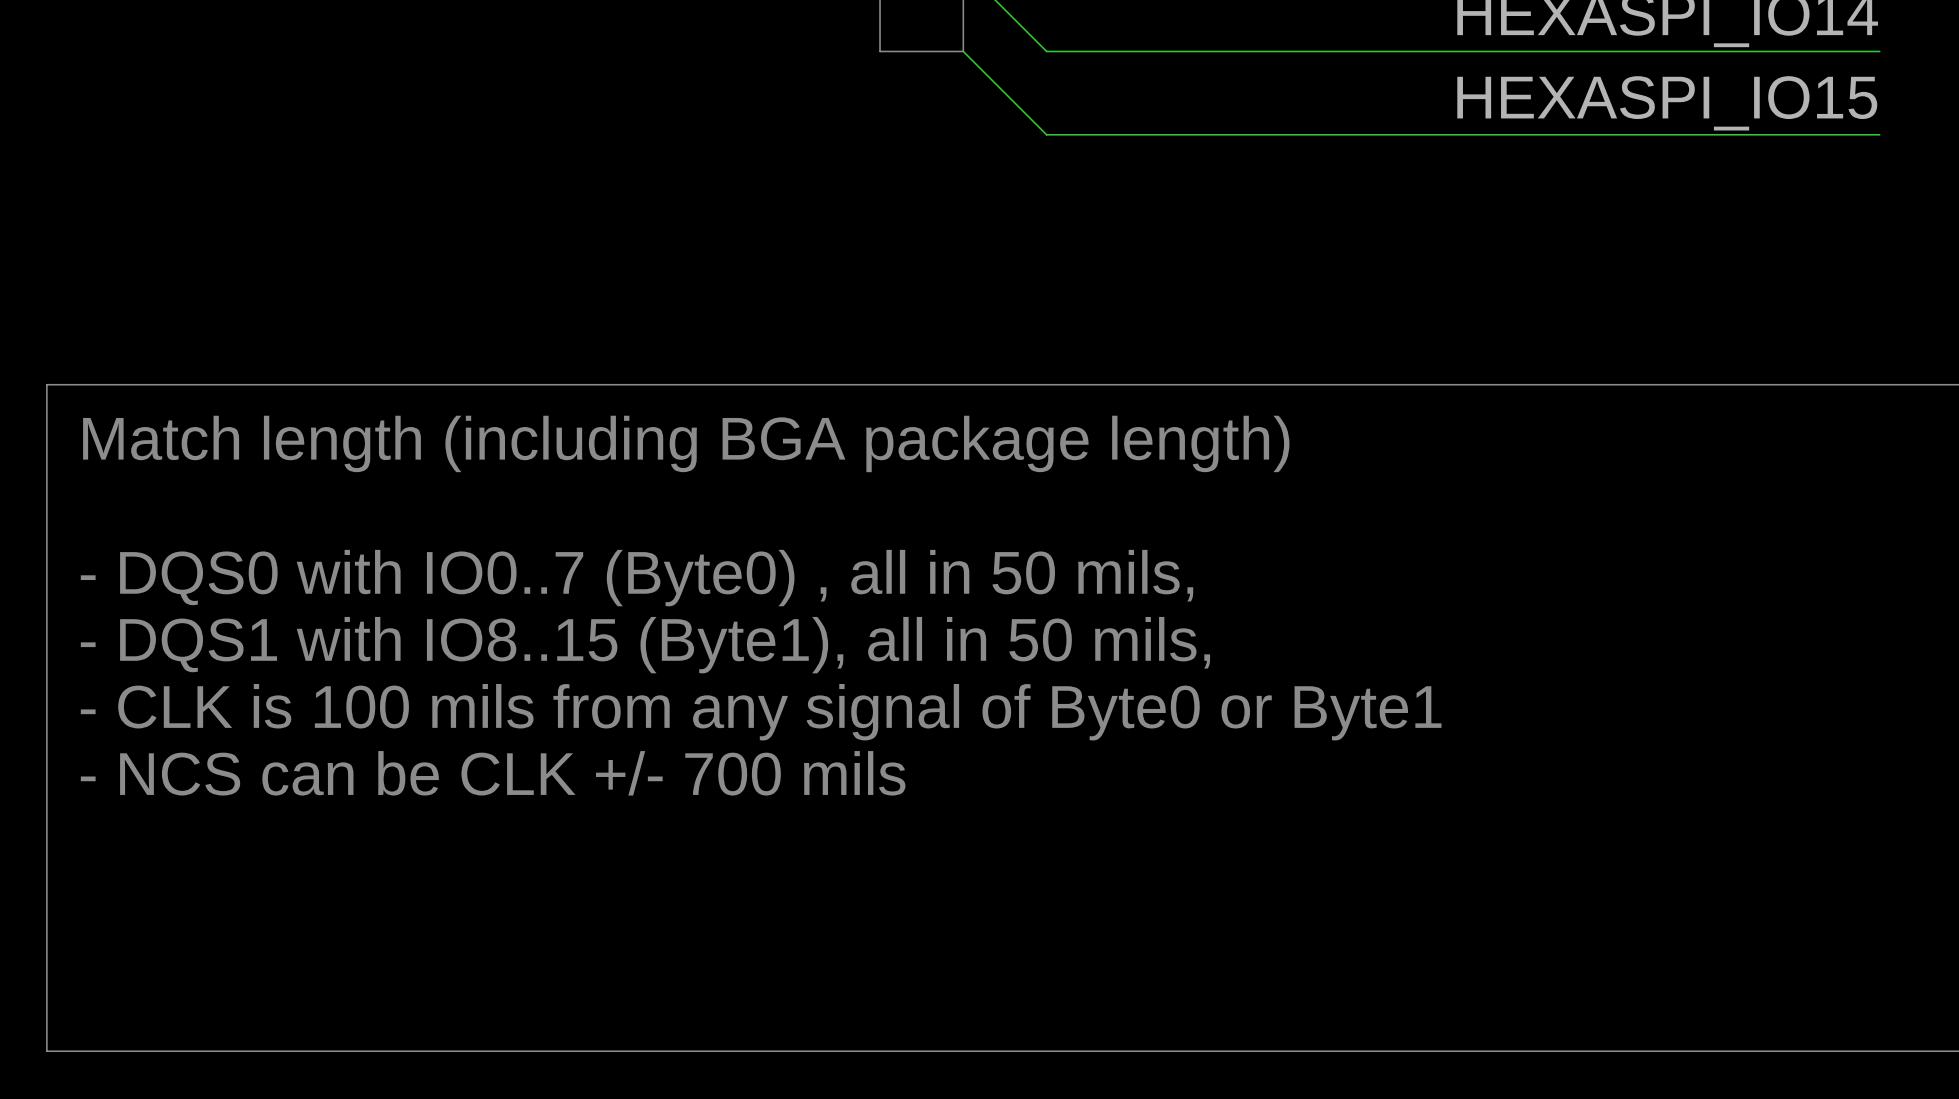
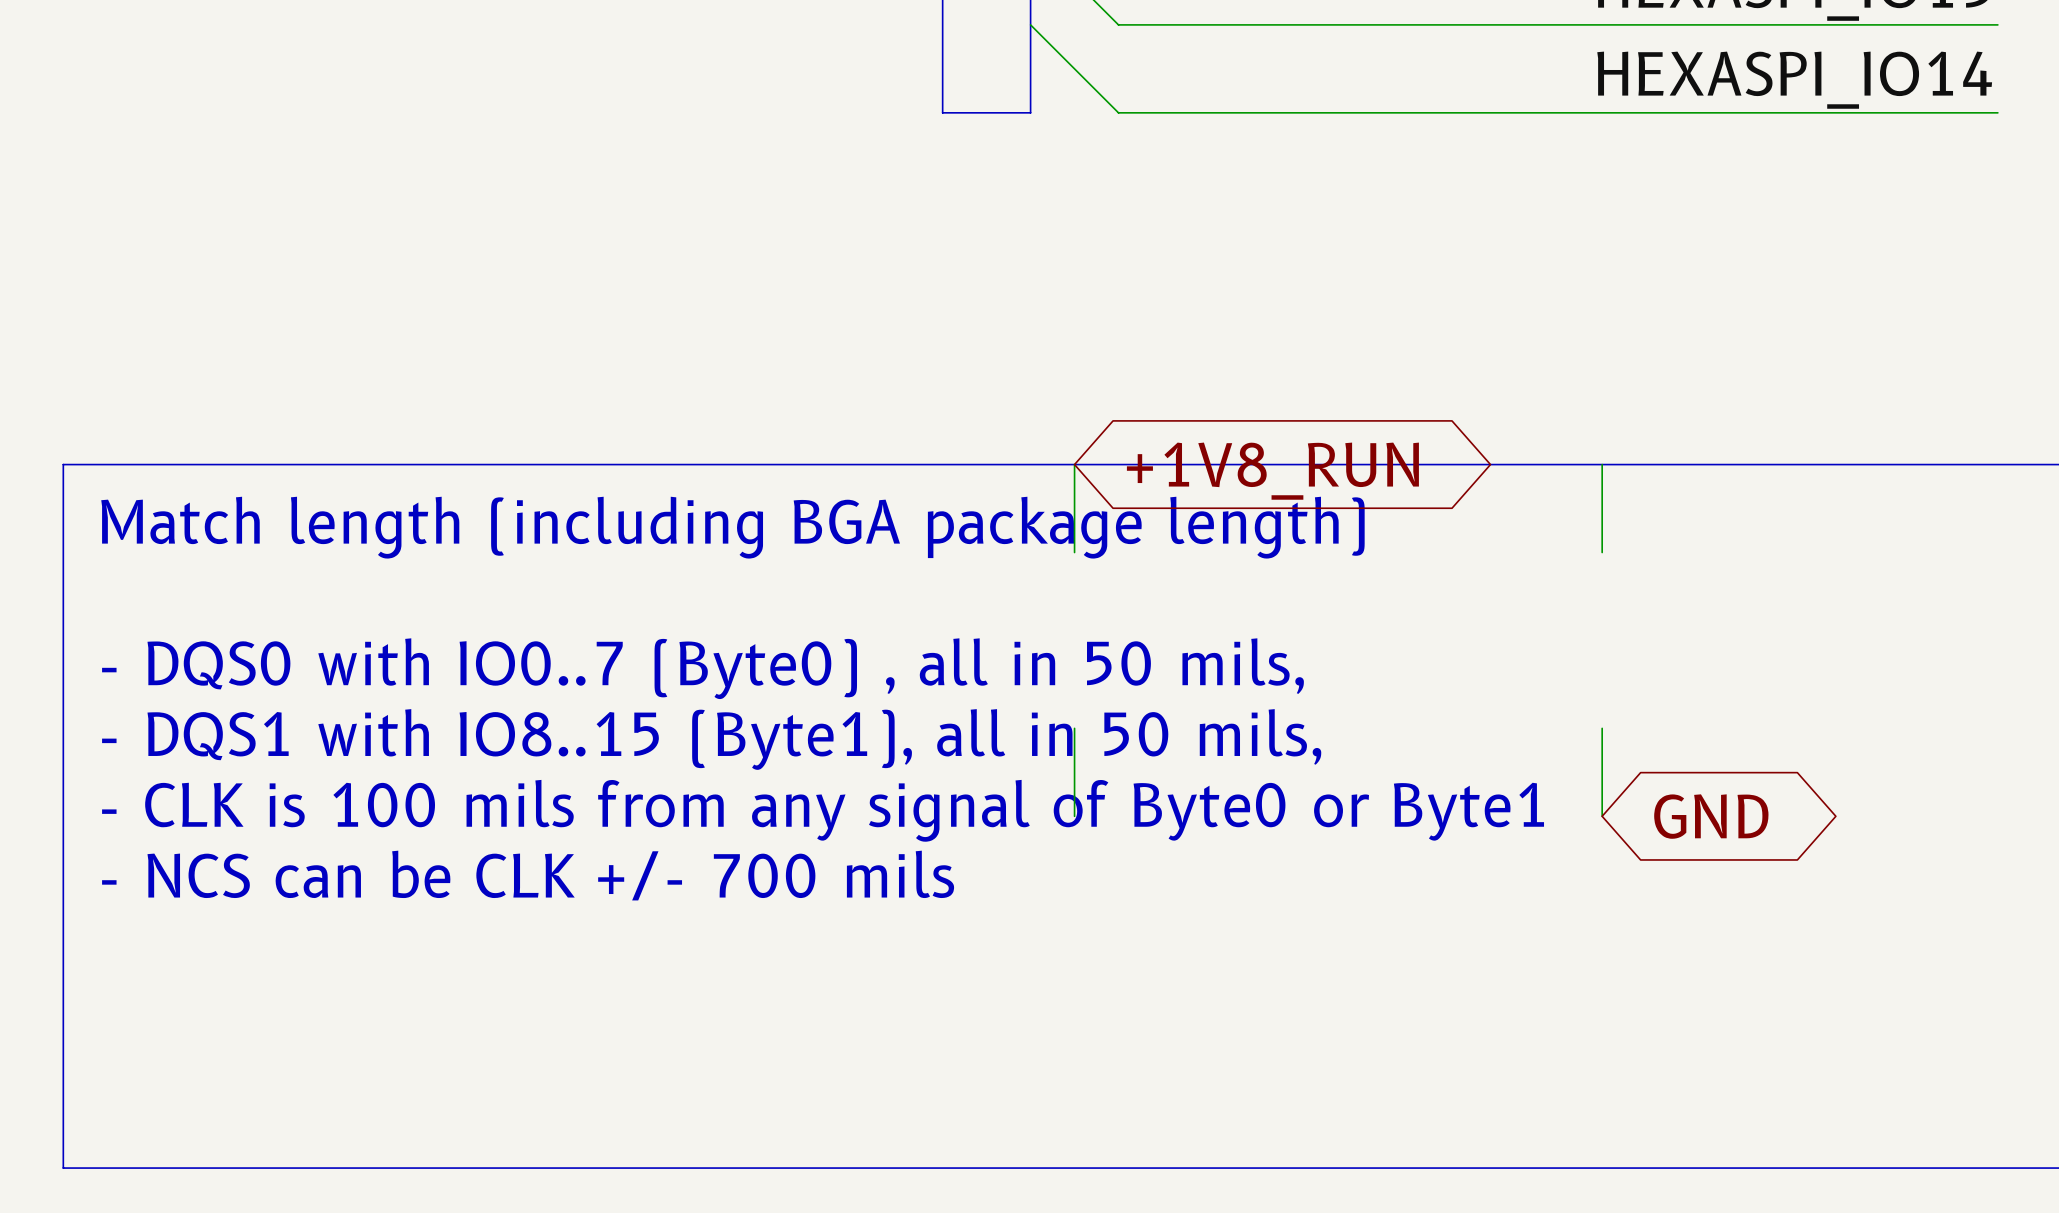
wire: (963, 51) (1046, 134) (1879, 134) -> none
label: HEXASPI_IO15 (1667, 103) -> none
wire: none -> (1074, 464) (1074, 552)
wire: none -> (1602, 464) (1602, 552)
global label: none -> +1V8_RUN (1272, 471)
wire: none -> (1074, 728) (1074, 816)
wire: none -> (1602, 728) (1602, 816)
global label: none -> GND (1711, 816)

